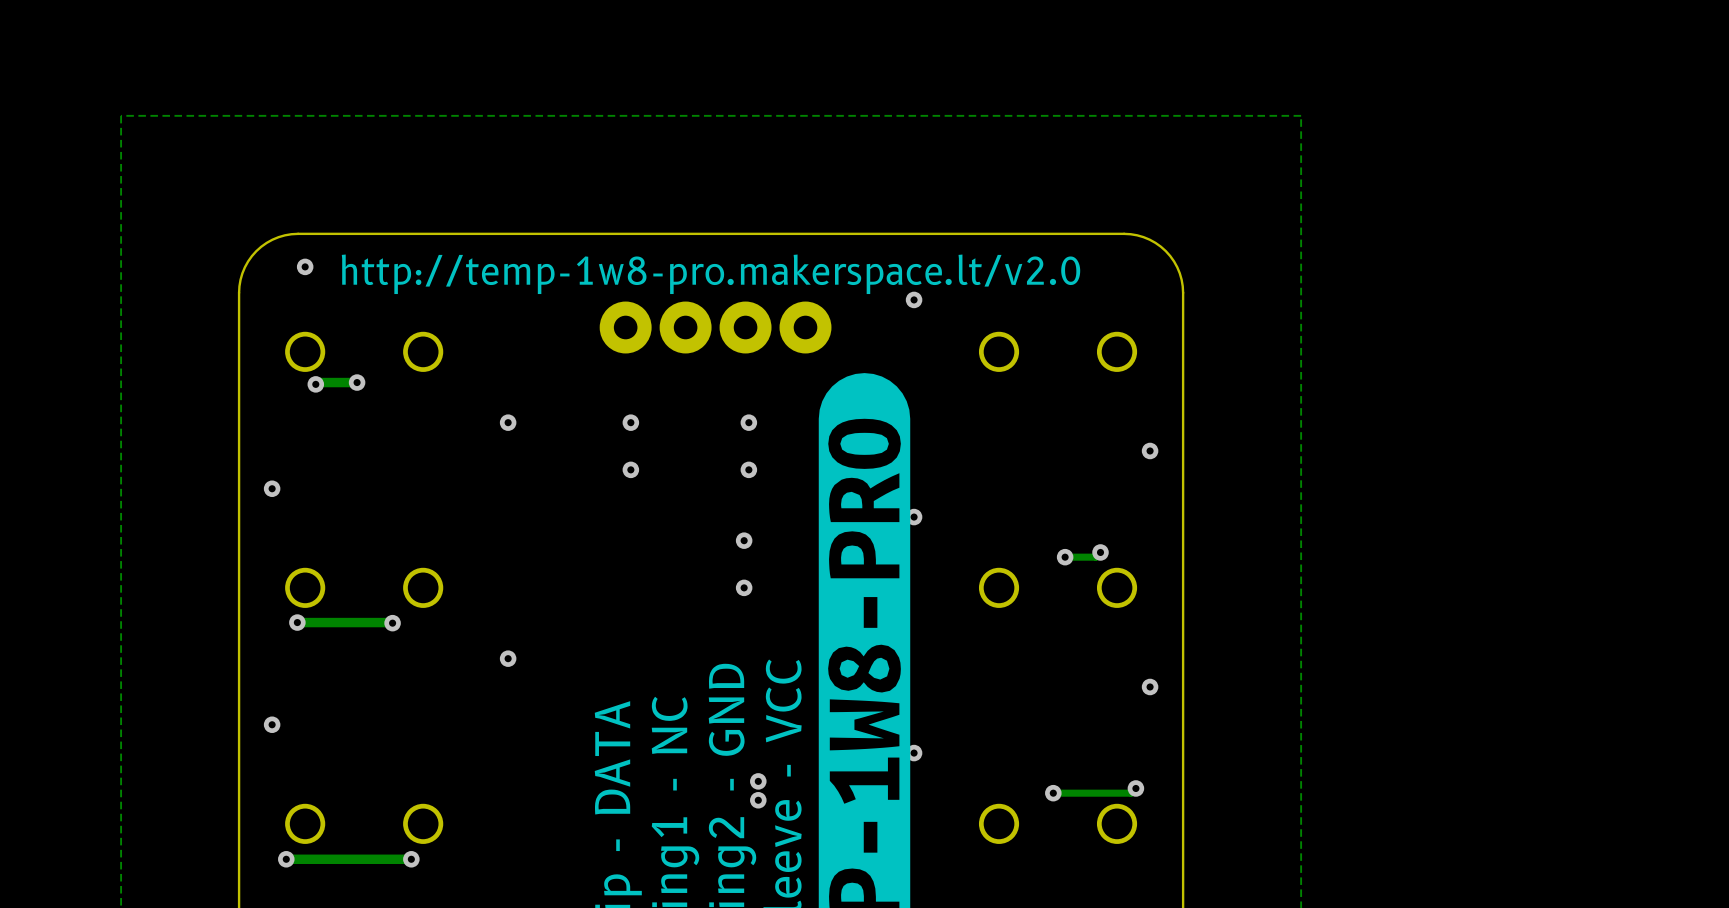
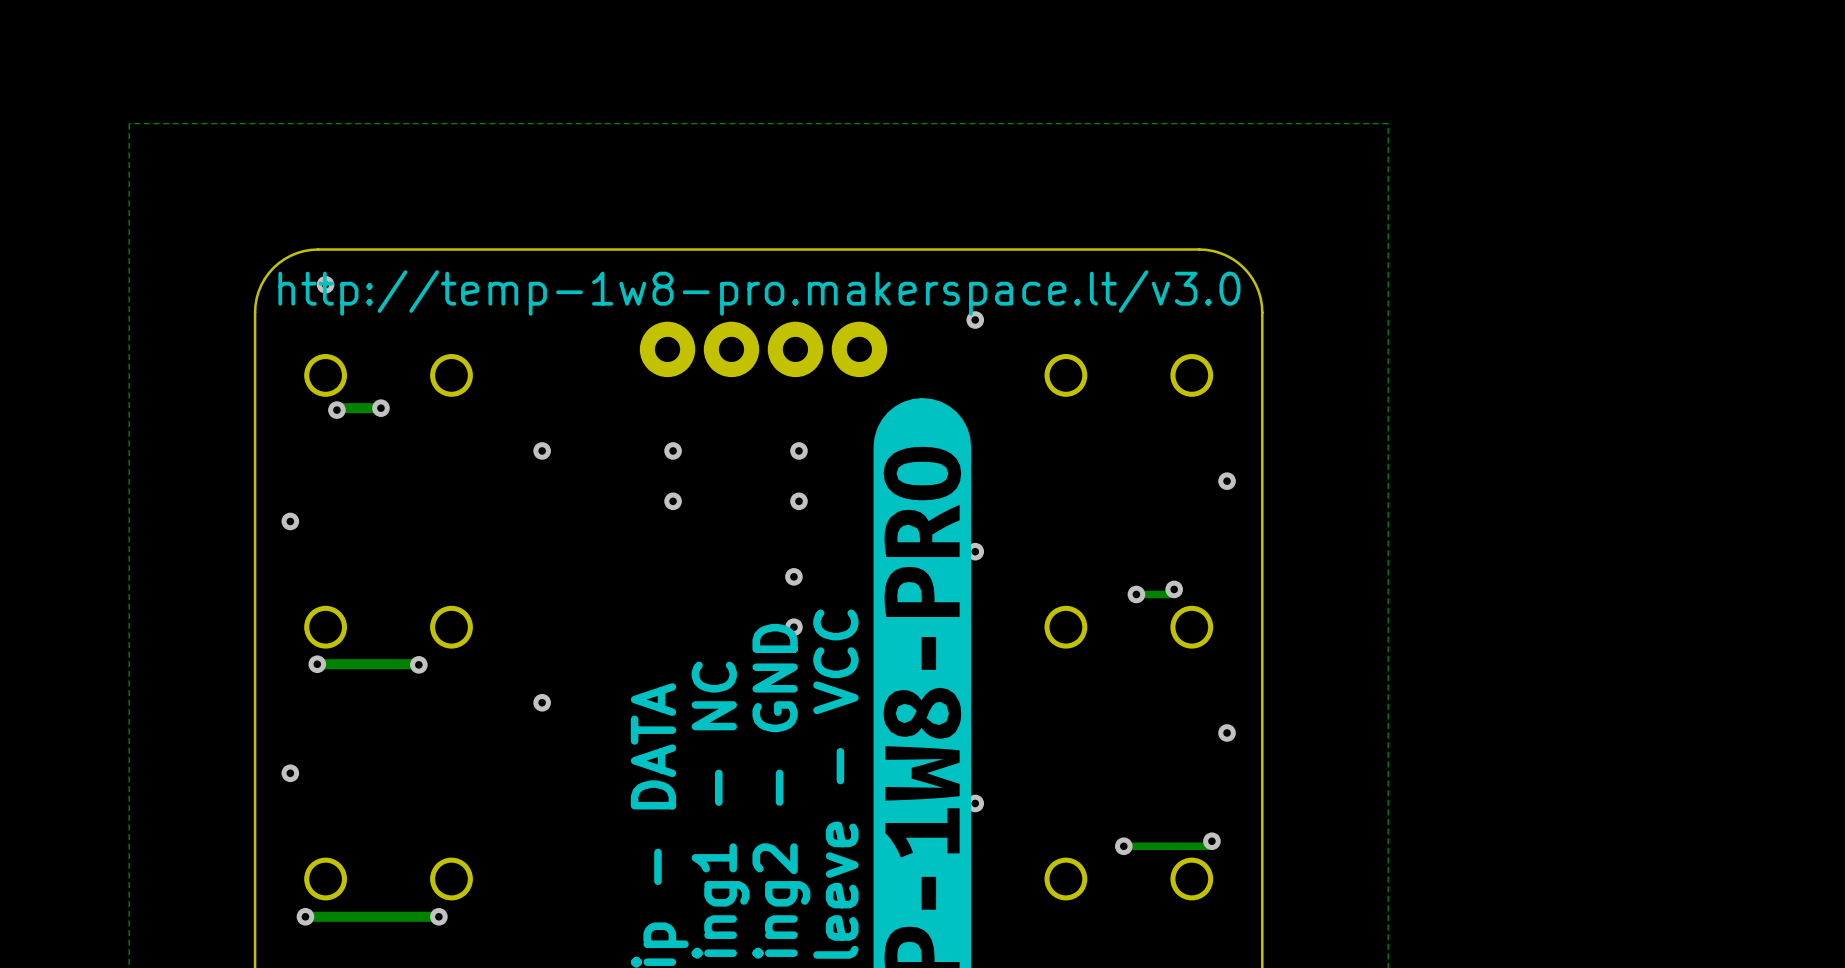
text: http://temp-1w8-pro.makerspace.lt/v2.0 (711, 274) -> http://temp-1w8-pro.makerspace.lt/v3.0 (759, 292)
via: (758, 781) -> none
via: (758, 800) -> none

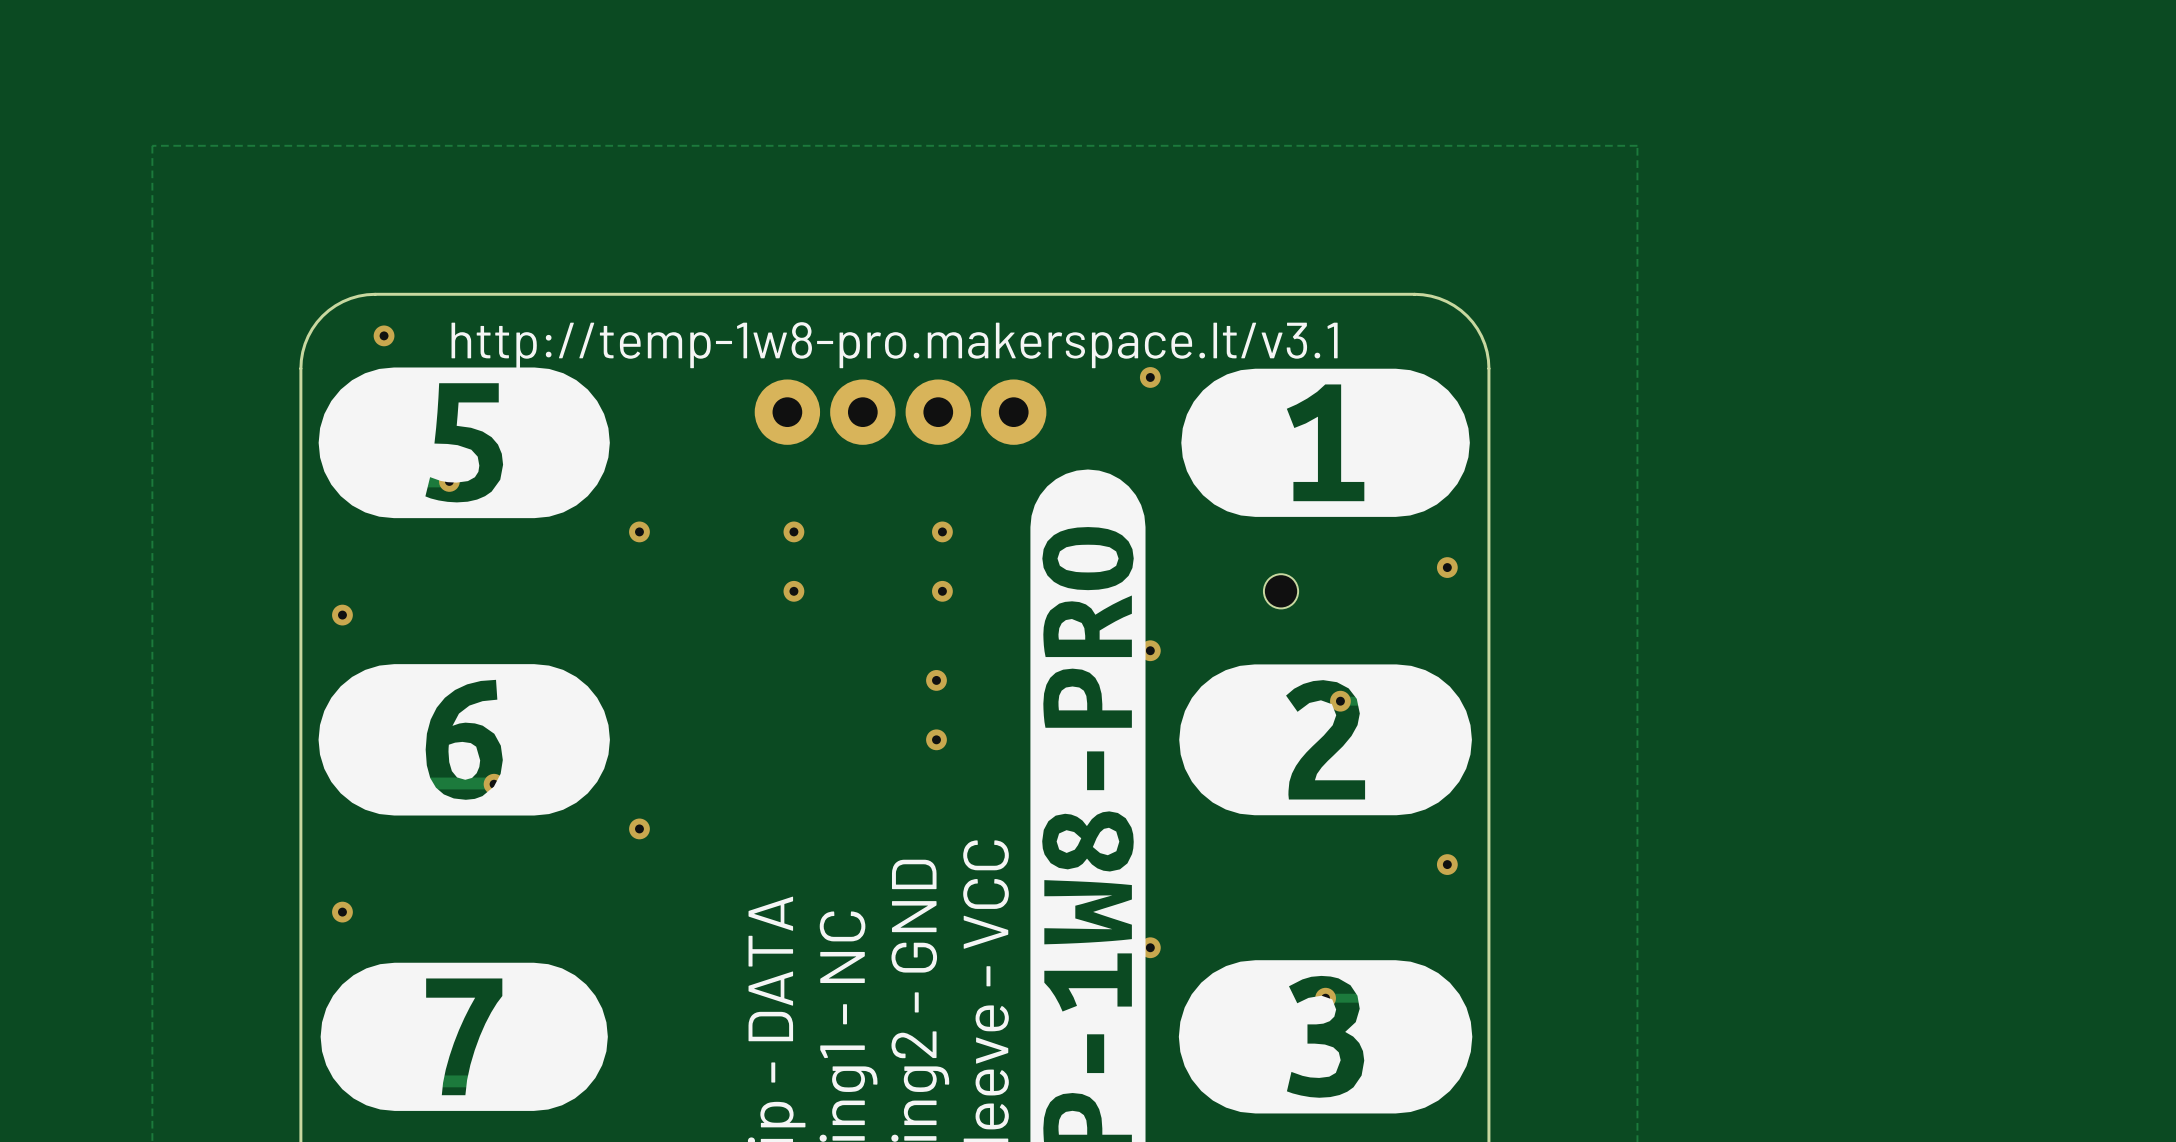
text: http://temp-1w8-pro.makerspace.lt/v3.0 (759, 292) -> http://temp-1w8-pro.makerspace.lt/v3.1 (894, 345)
drawing: none -> [318, 367, 610, 519]
drawing: none -> [1181, 368, 1470, 517]
part: none -> (1281, 591)
drawing: none -> [318, 664, 610, 816]
drawing: none -> [1179, 664, 1472, 816]
drawing: none -> [1178, 960, 1473, 1114]
drawing: none -> [320, 962, 608, 1111]

